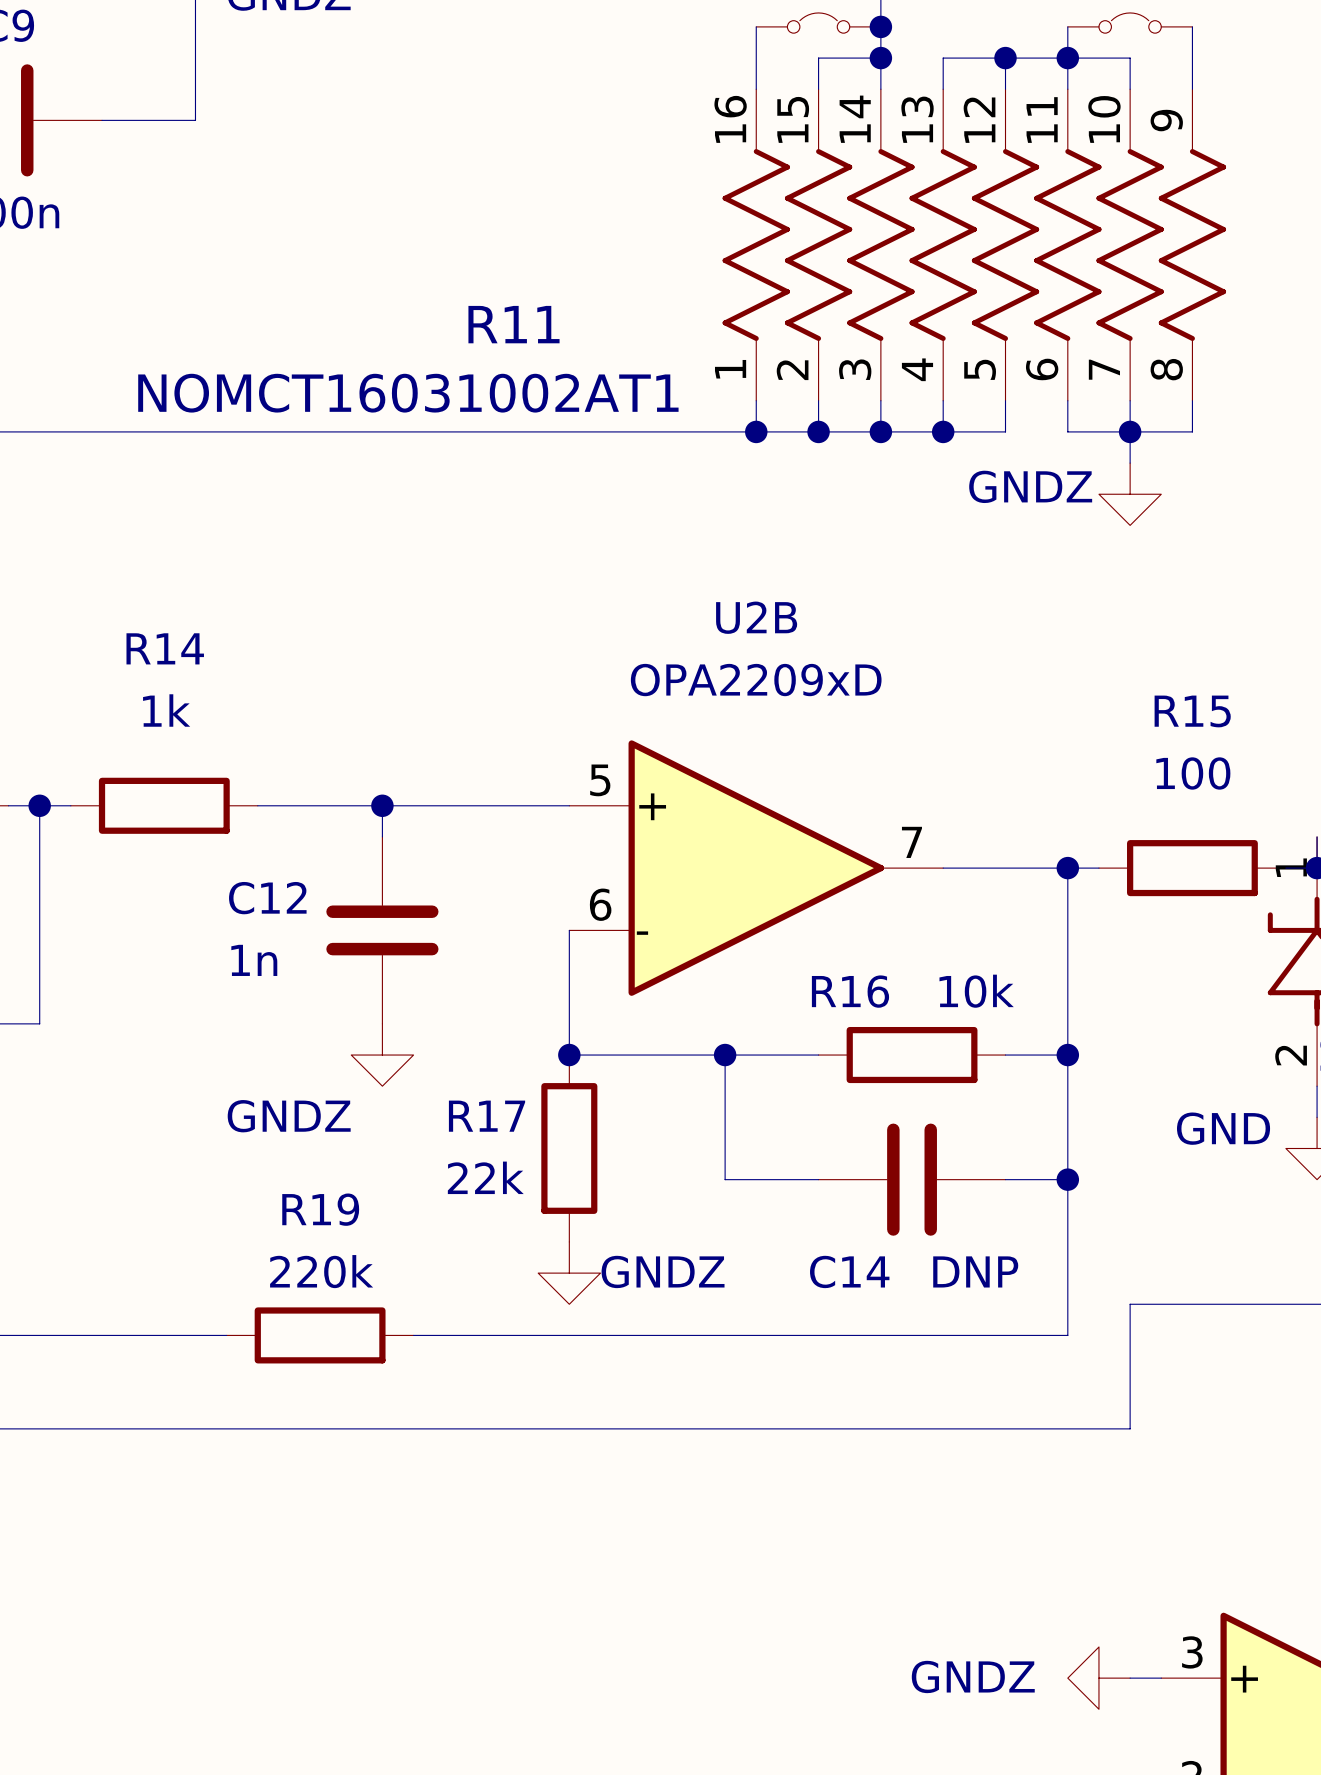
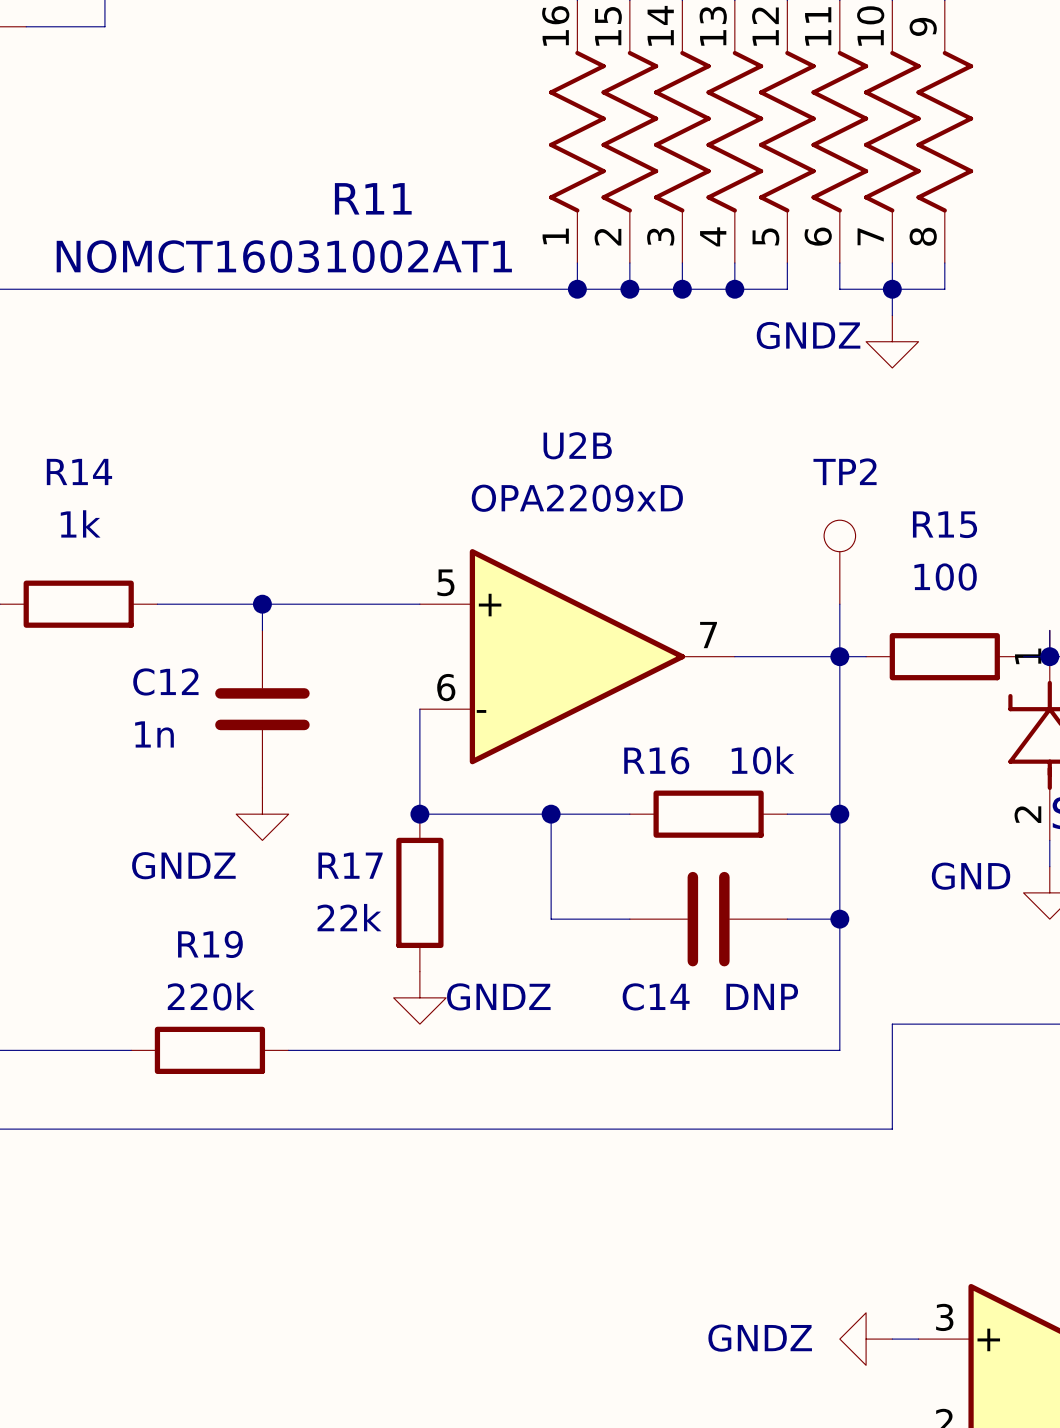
TP2: none -> (839, 562)
wire: none -> (839, 604) (839, 656)

